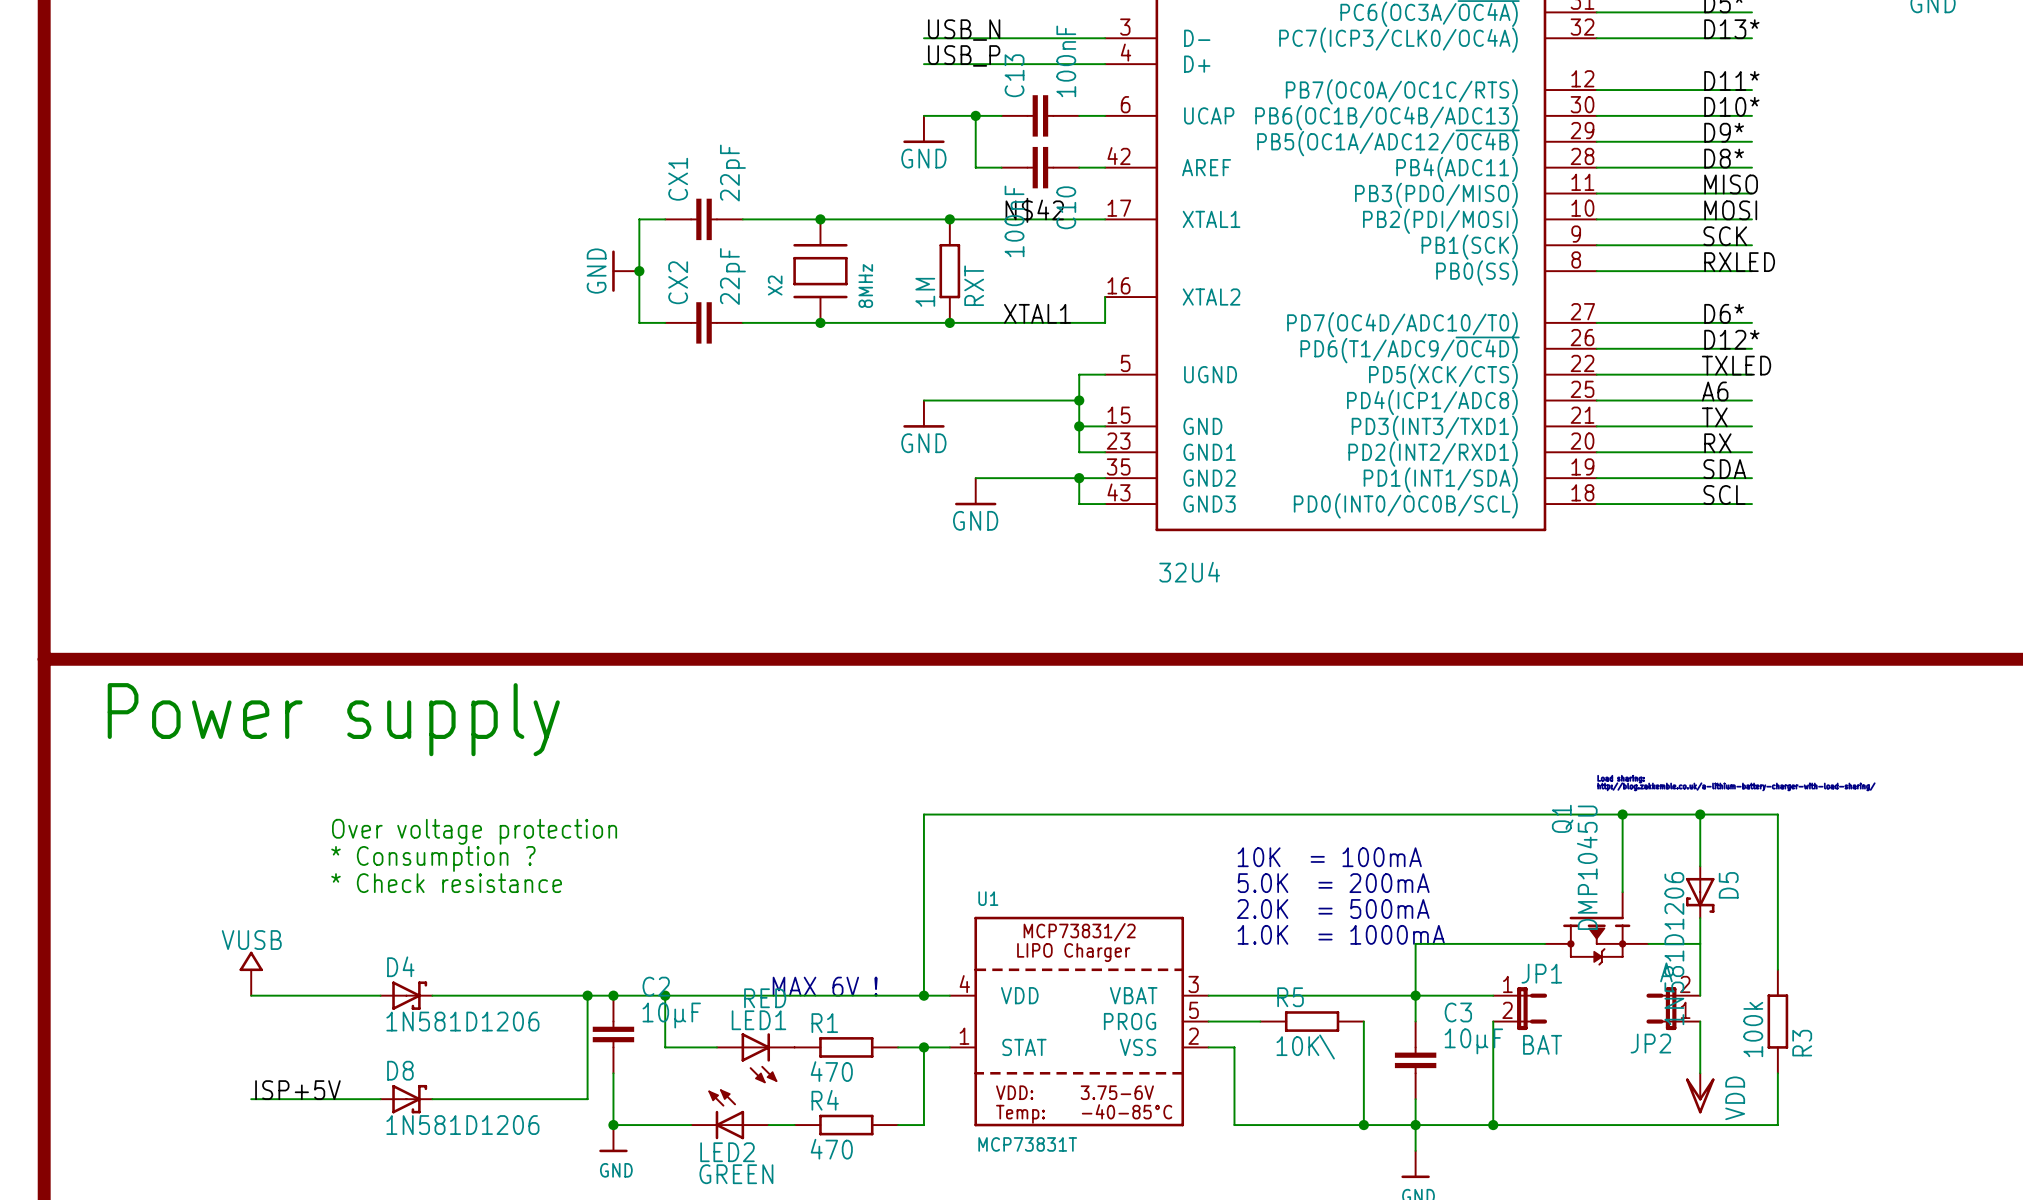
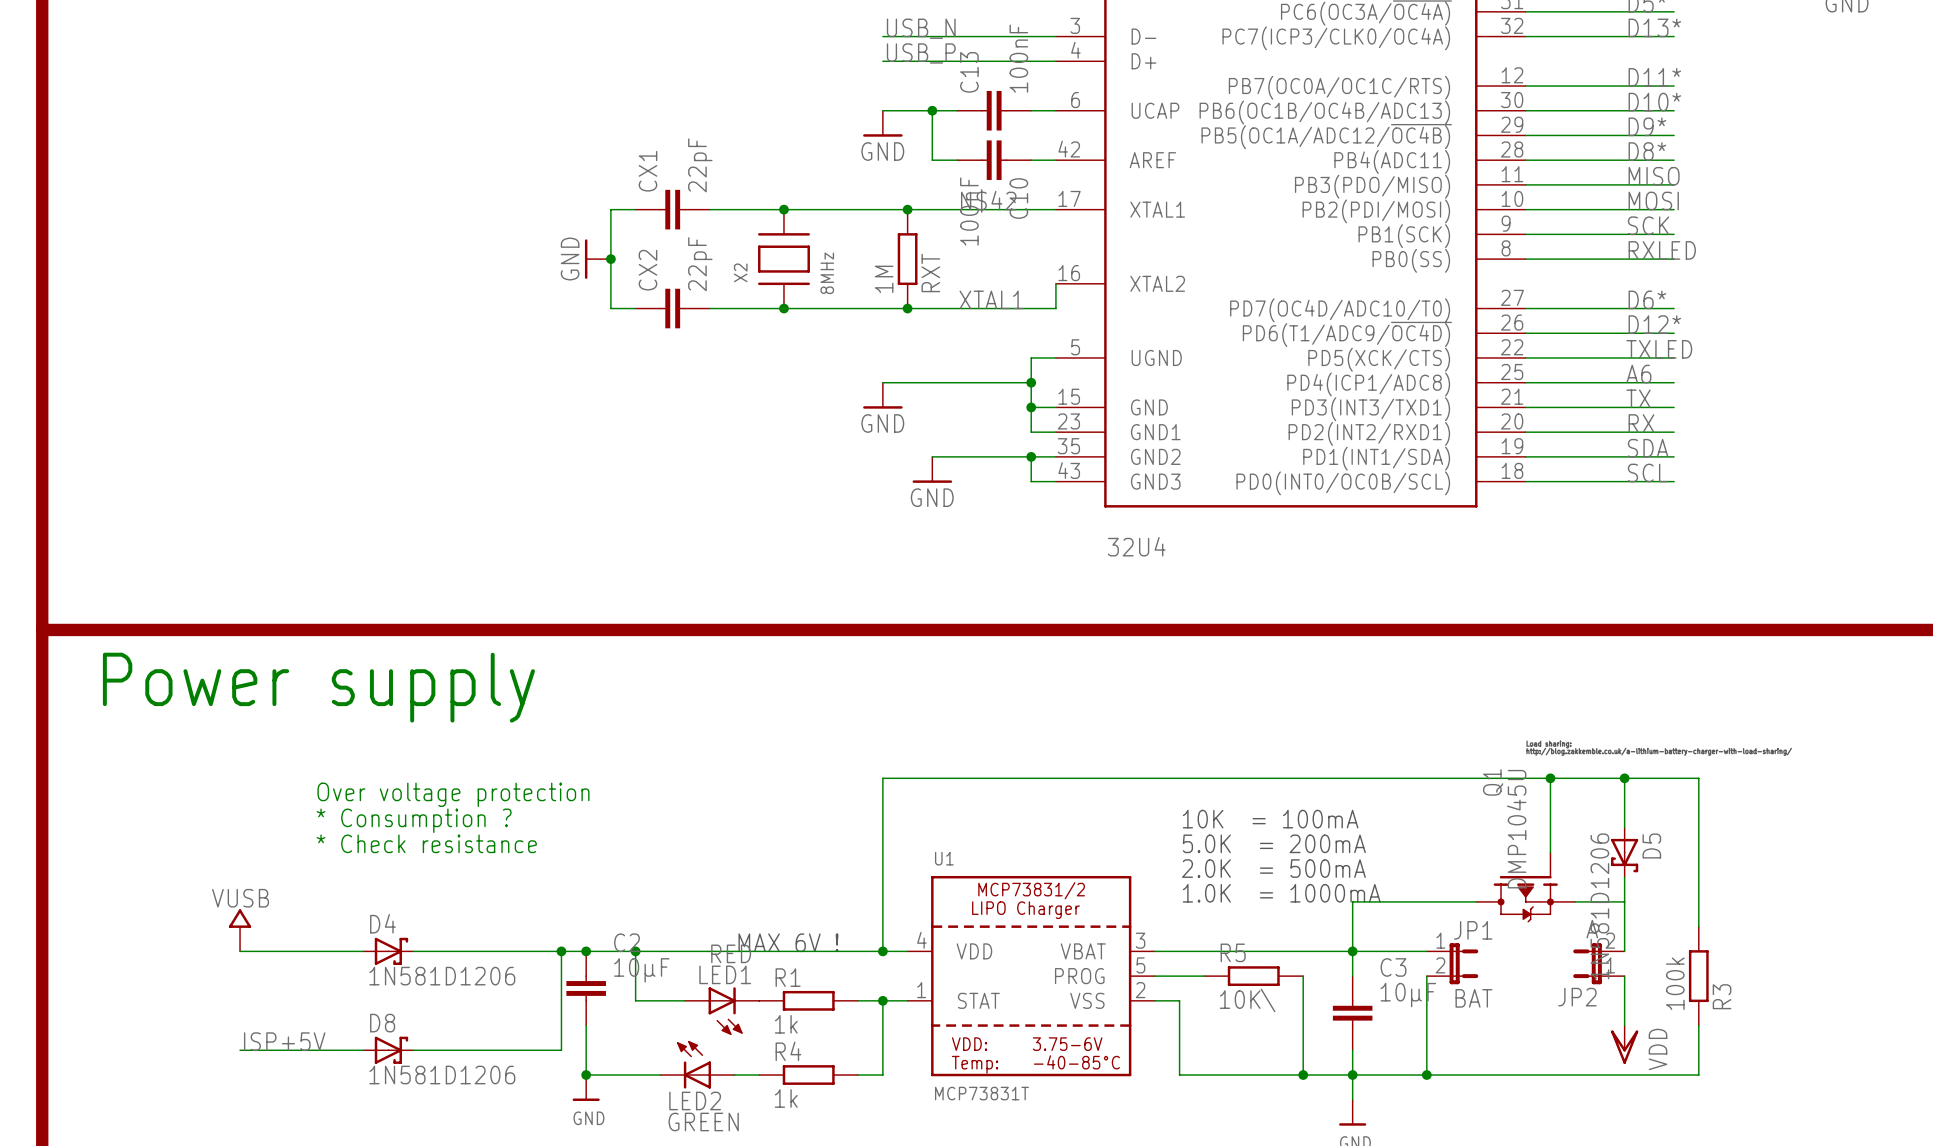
R1 value: 470 (831, 1071) -> 1k (786, 1024)
R4 value: 470 (831, 1149) -> 1k (786, 1098)

